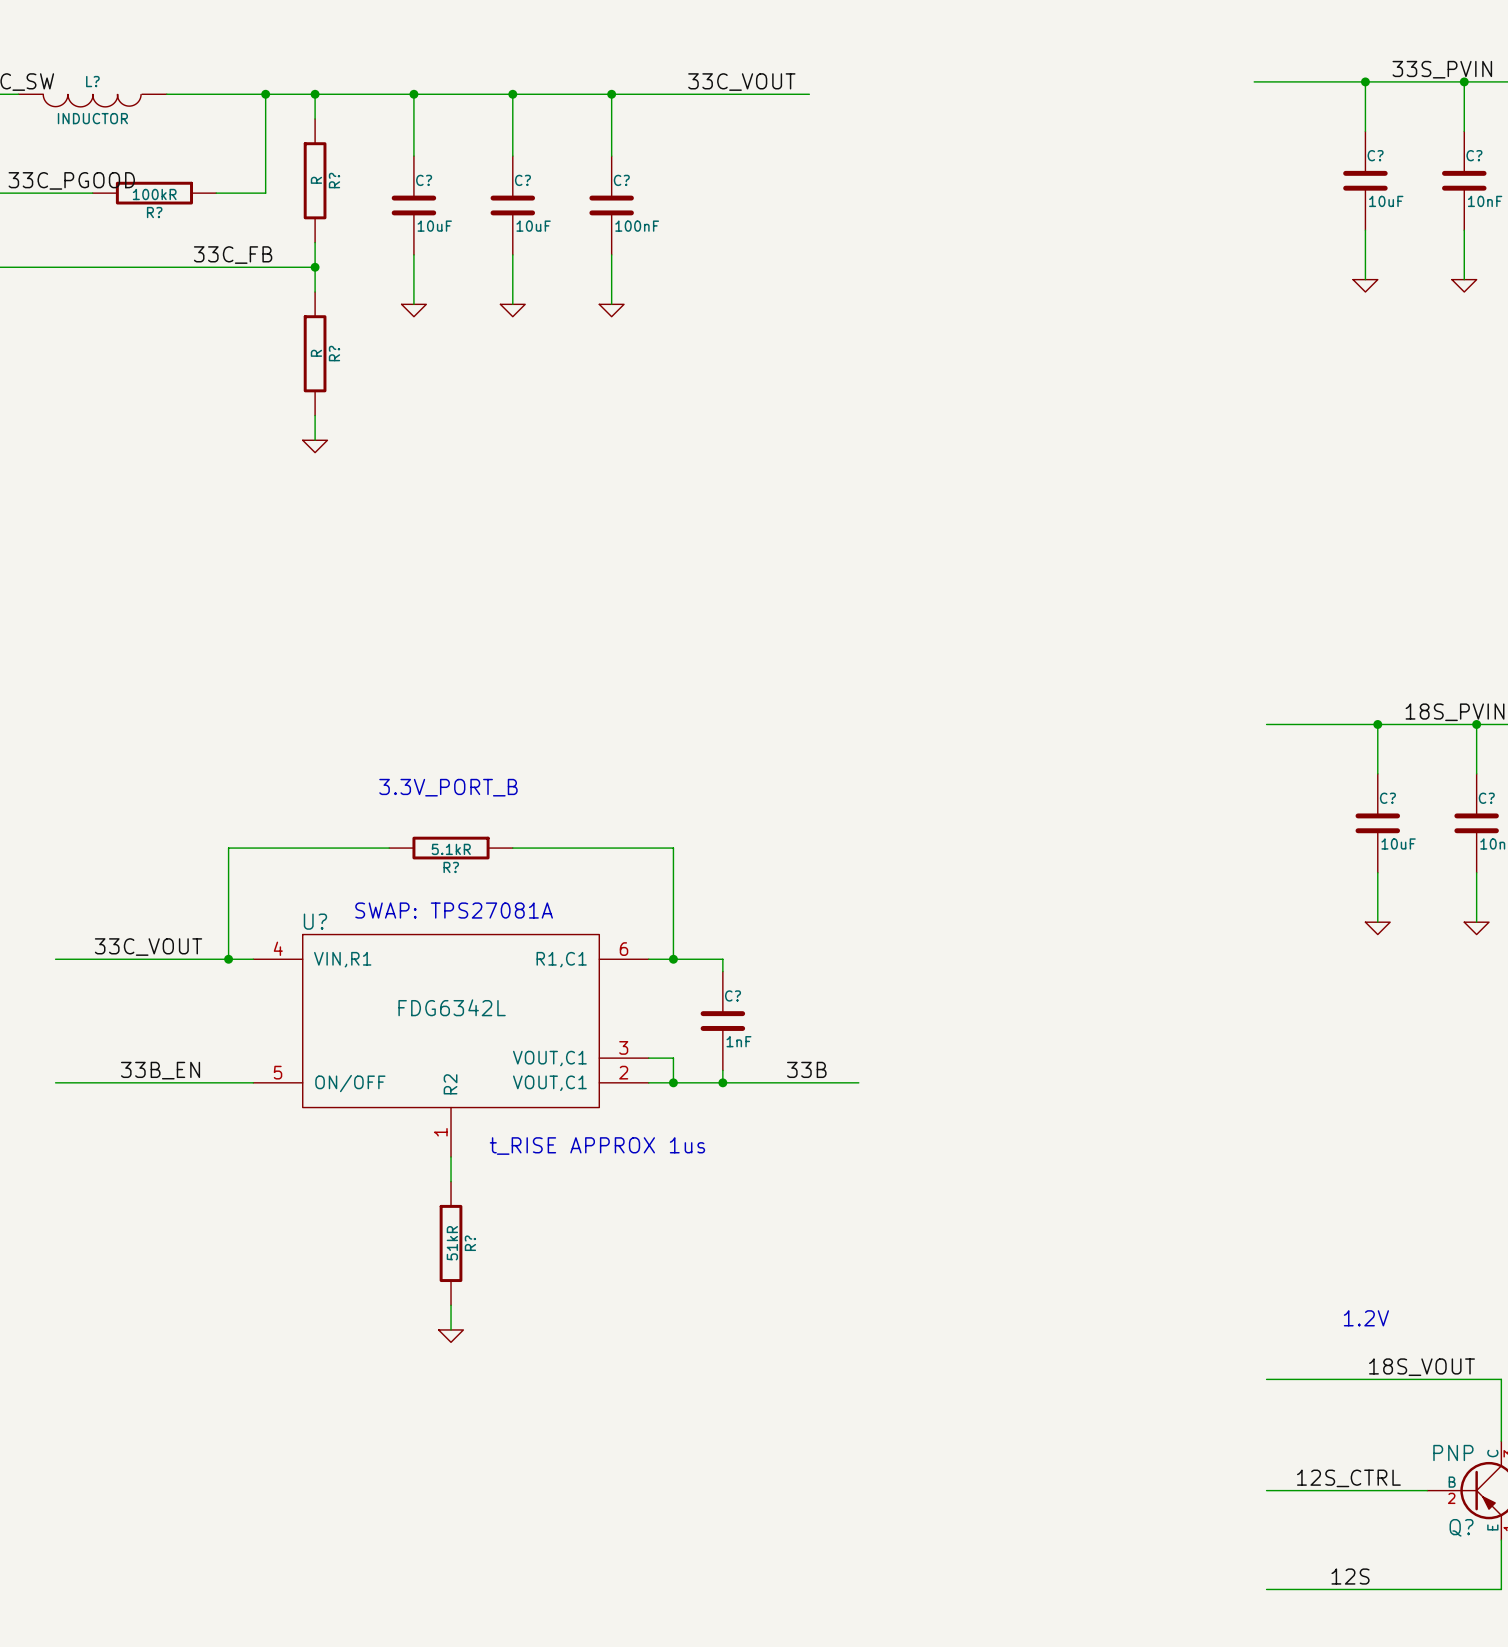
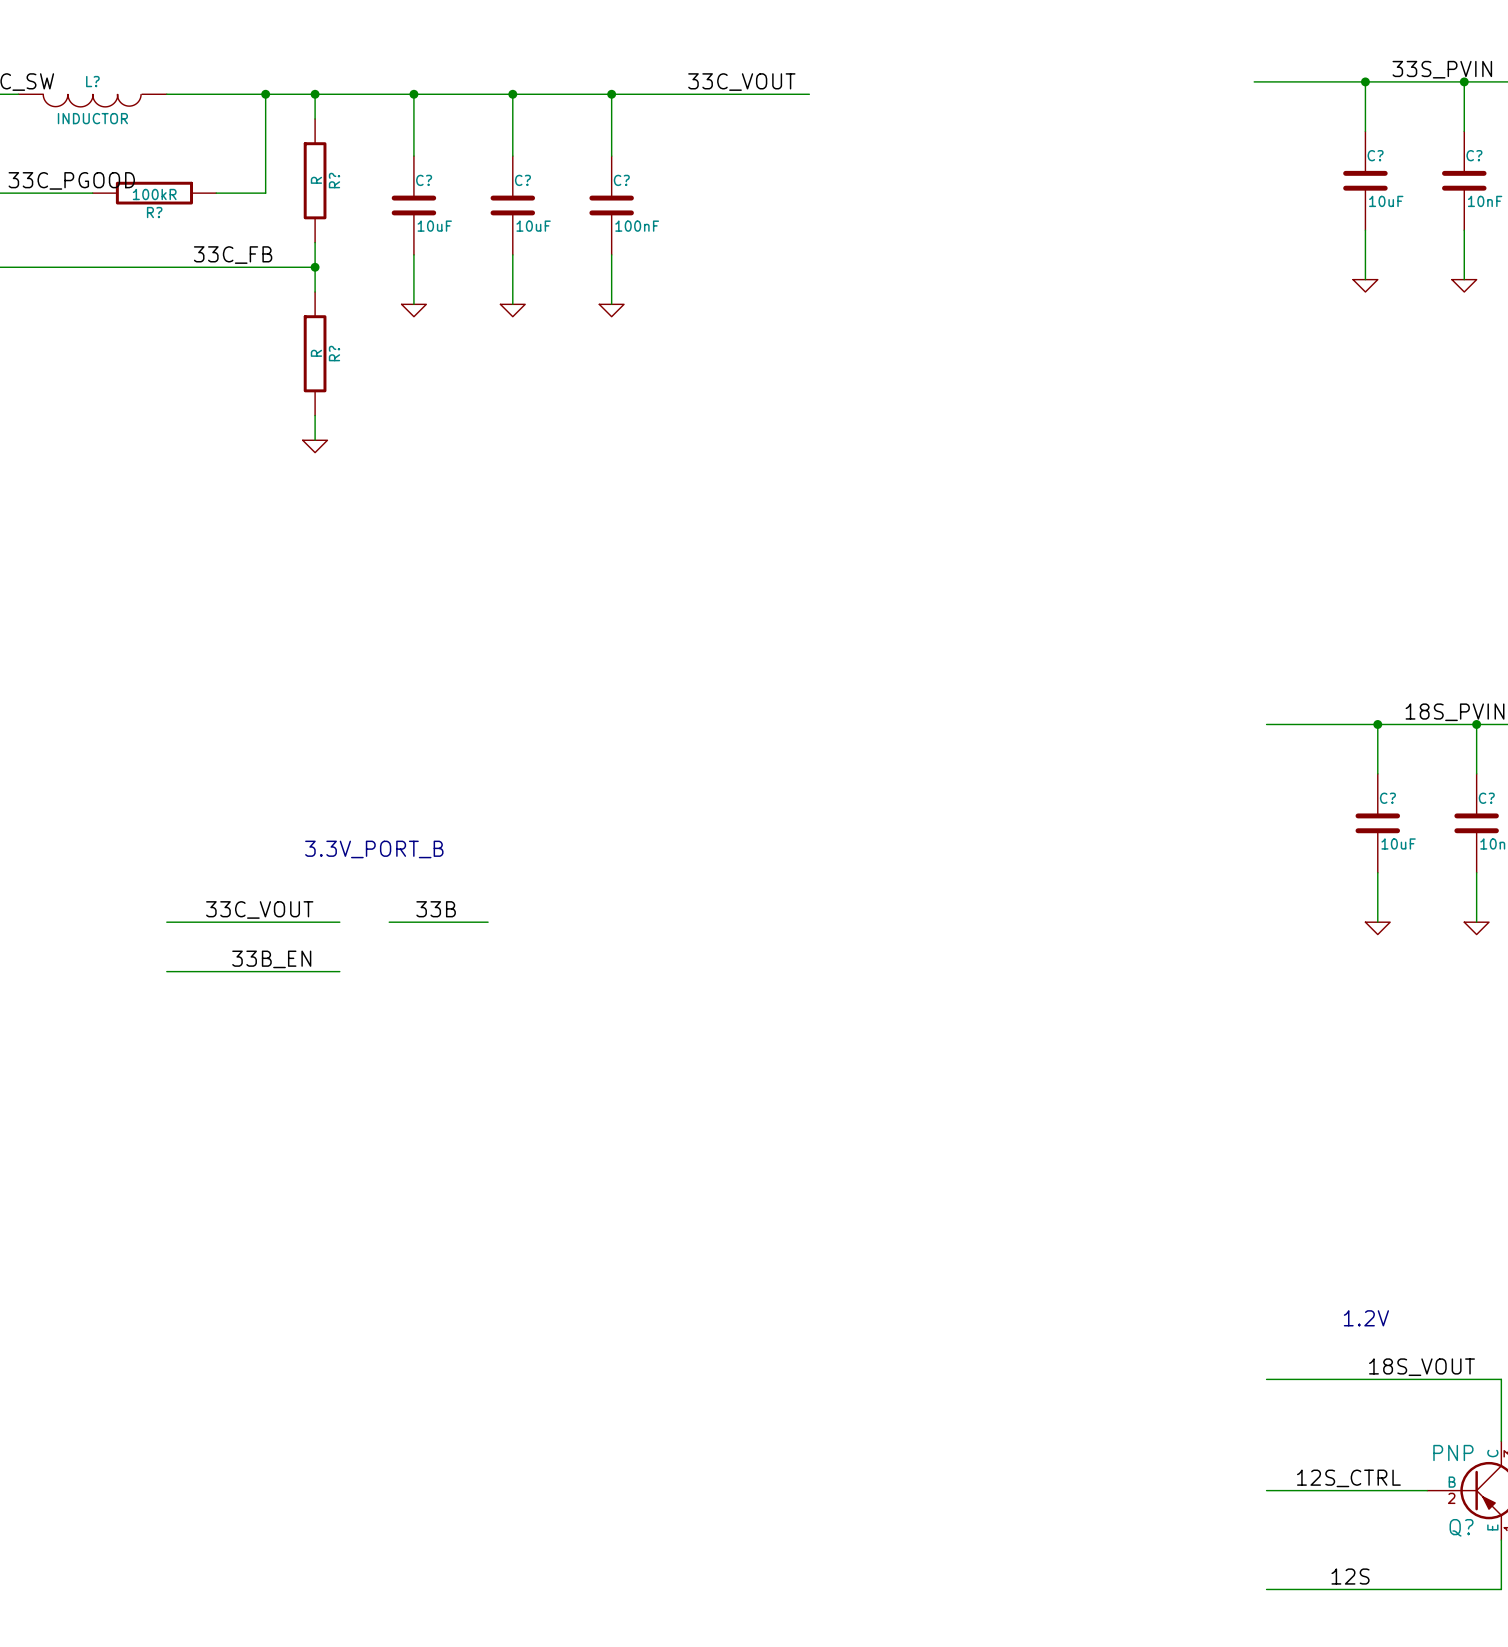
text position: 3.3V_PORT_B (448, 787) -> 3.3V_PORT_B (374, 849)
wire: (389, 848) (228, 848) (228, 959) -> none
R?: 5.1kR (451, 848) -> none
wire: (512, 848) (673, 848) (673, 959) -> none
label: none -> 33B (436, 909)
text: SWAP: TPS27081A (454, 910) -> none
wire: none -> (166, 922) (339, 922)
wire: none -> (389, 922) (488, 922)
label position: 33C_VOUT (148, 947) -> 33C_VOUT (259, 909)
wire: (55, 959) (253, 959) -> none
junction: (228, 959) -> none
wire: (648, 959) (722, 959) (722, 971) -> none
junction: (673, 959) -> none
wire: none -> (166, 971) (339, 971)
C?: 1nF (722, 1021) -> none
U?: FDG6342L (451, 1045) -> none
wire: (648, 1058) (673, 1058) (673, 1082) -> none
label: 33B (806, 1069) -> none
label position: 33B_EN (160, 1070) -> 33B_EN (271, 959)
wire: (722, 1070) (722, 1082) -> none
wire: (55, 1082) (253, 1082) -> none
wire: (648, 1082) (858, 1082) -> none
junction: (673, 1082) -> none
junction: (722, 1082) -> none
text: t_RISE APPROX 1us (597, 1146) -> none
wire: (451, 1156) (451, 1181) -> none
R?: 51kR (451, 1243) -> none
wire: (451, 1305) (451, 1329) -> none
power symbol: (451, 1336) -> none

